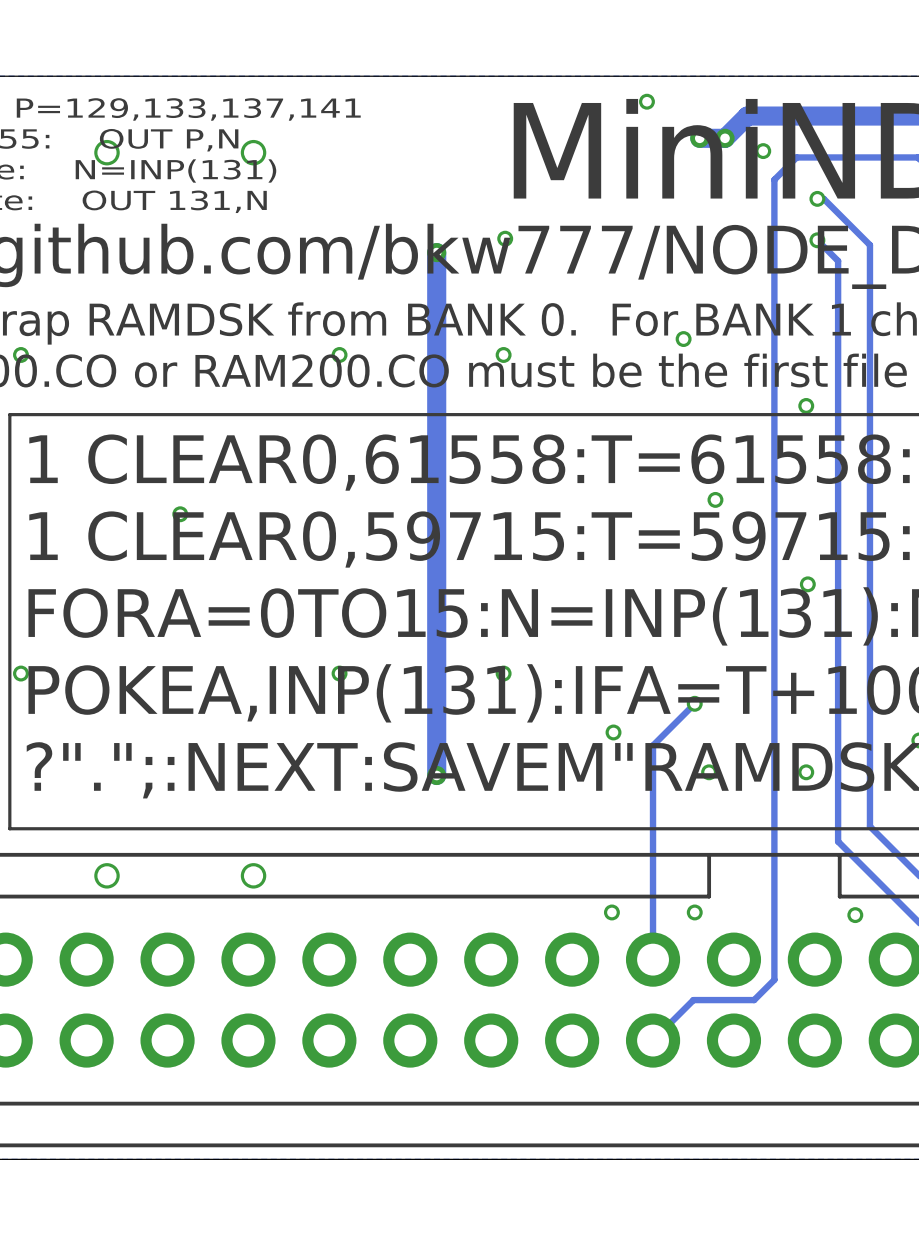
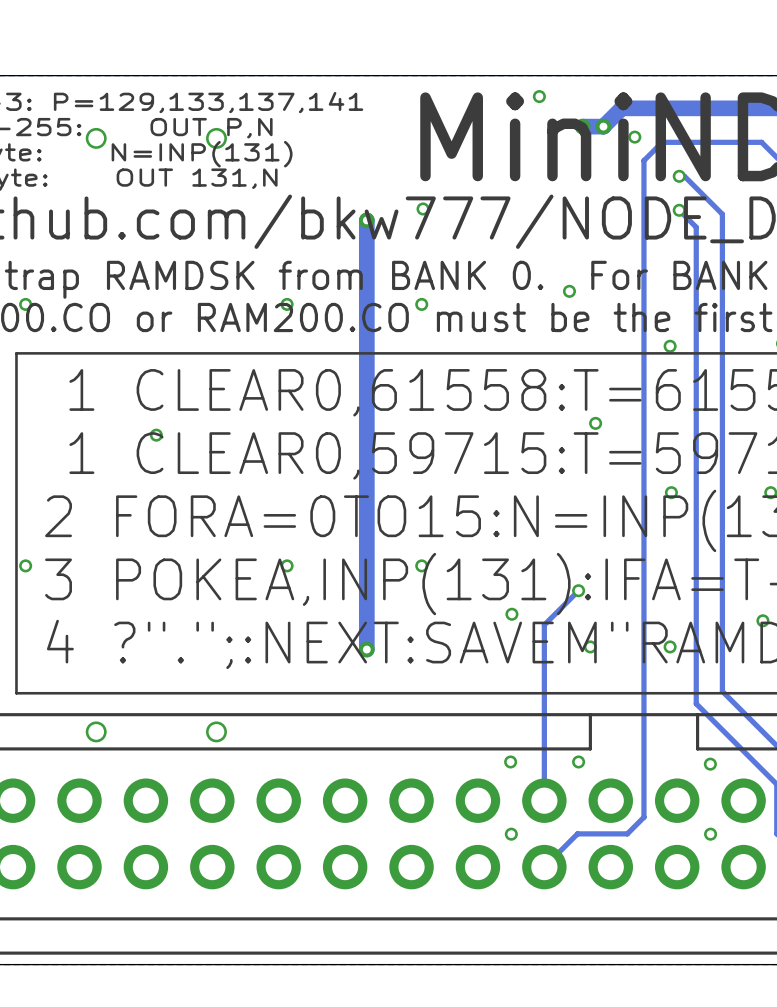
via: none -> (511, 834)
via: none -> (710, 834)

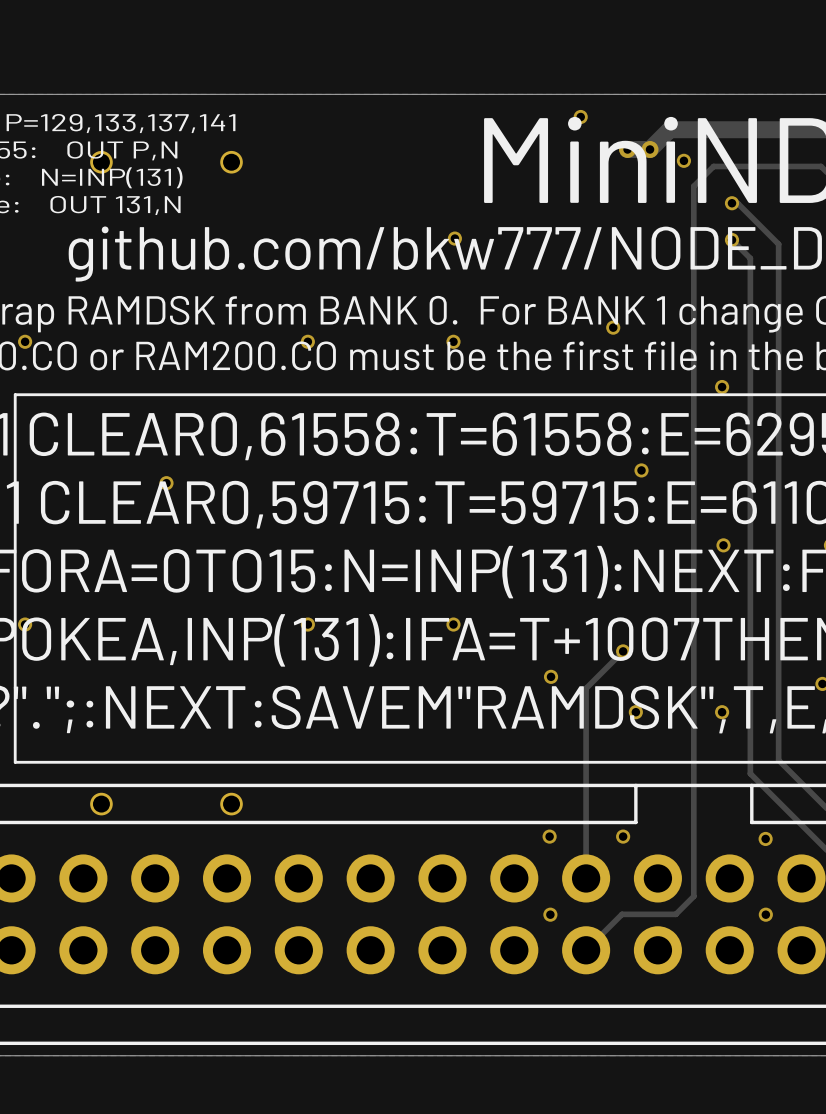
track: (366, 220) (366, 649) -> none
via: (366, 220) -> none
via: (366, 649) -> none

